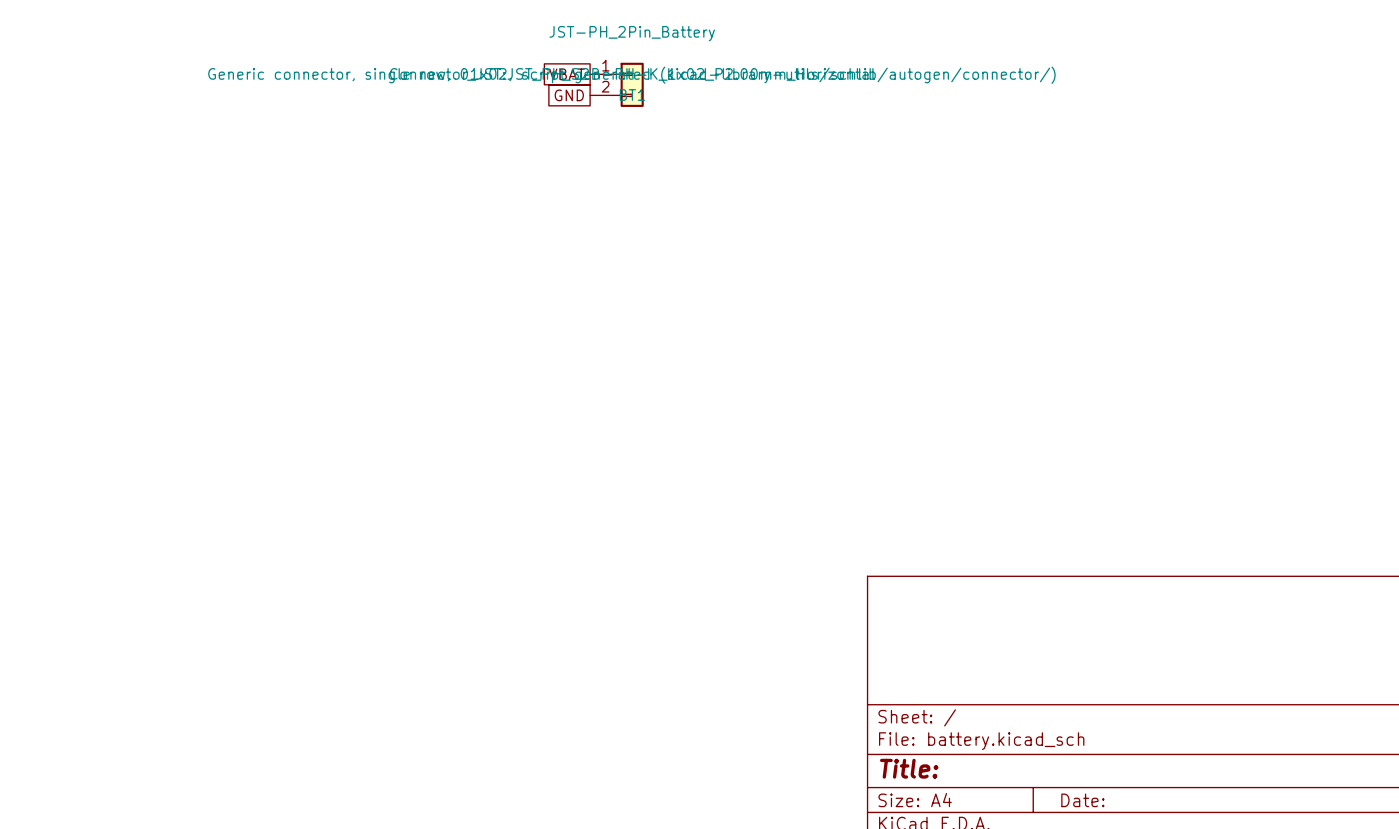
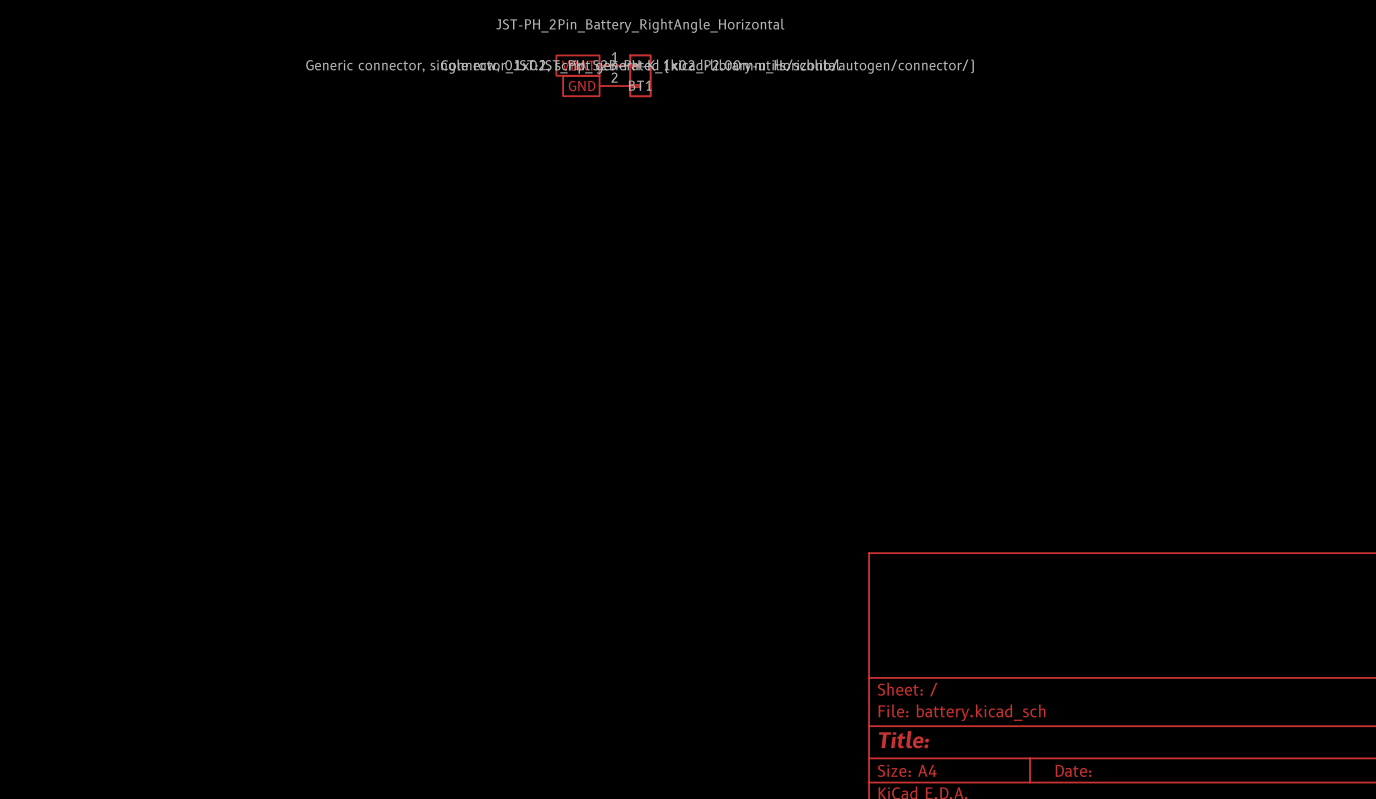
BT1 value: JST-PH_2Pin_Battery (632, 33) -> JST-PH_2Pin_Battery_RightAngle_Horizontal (640, 25)

